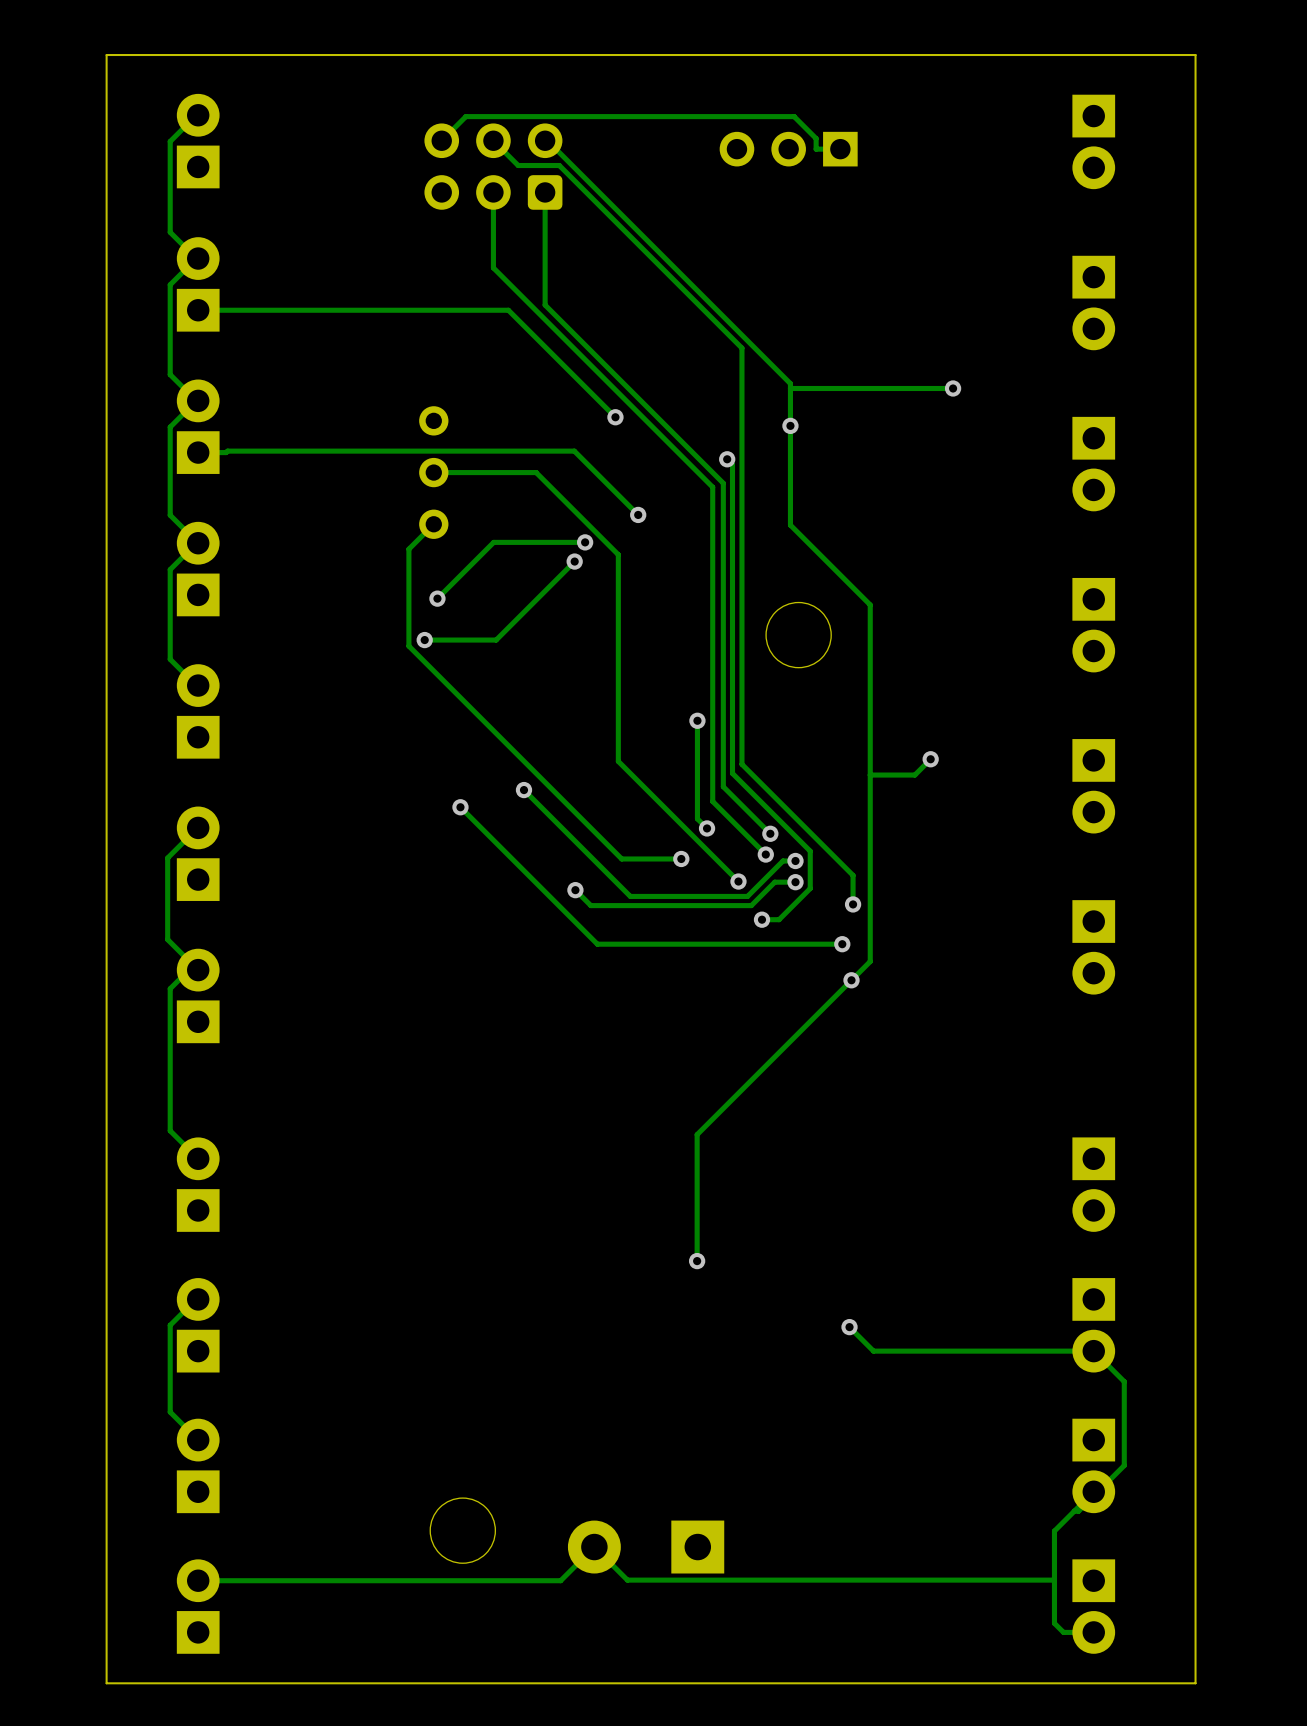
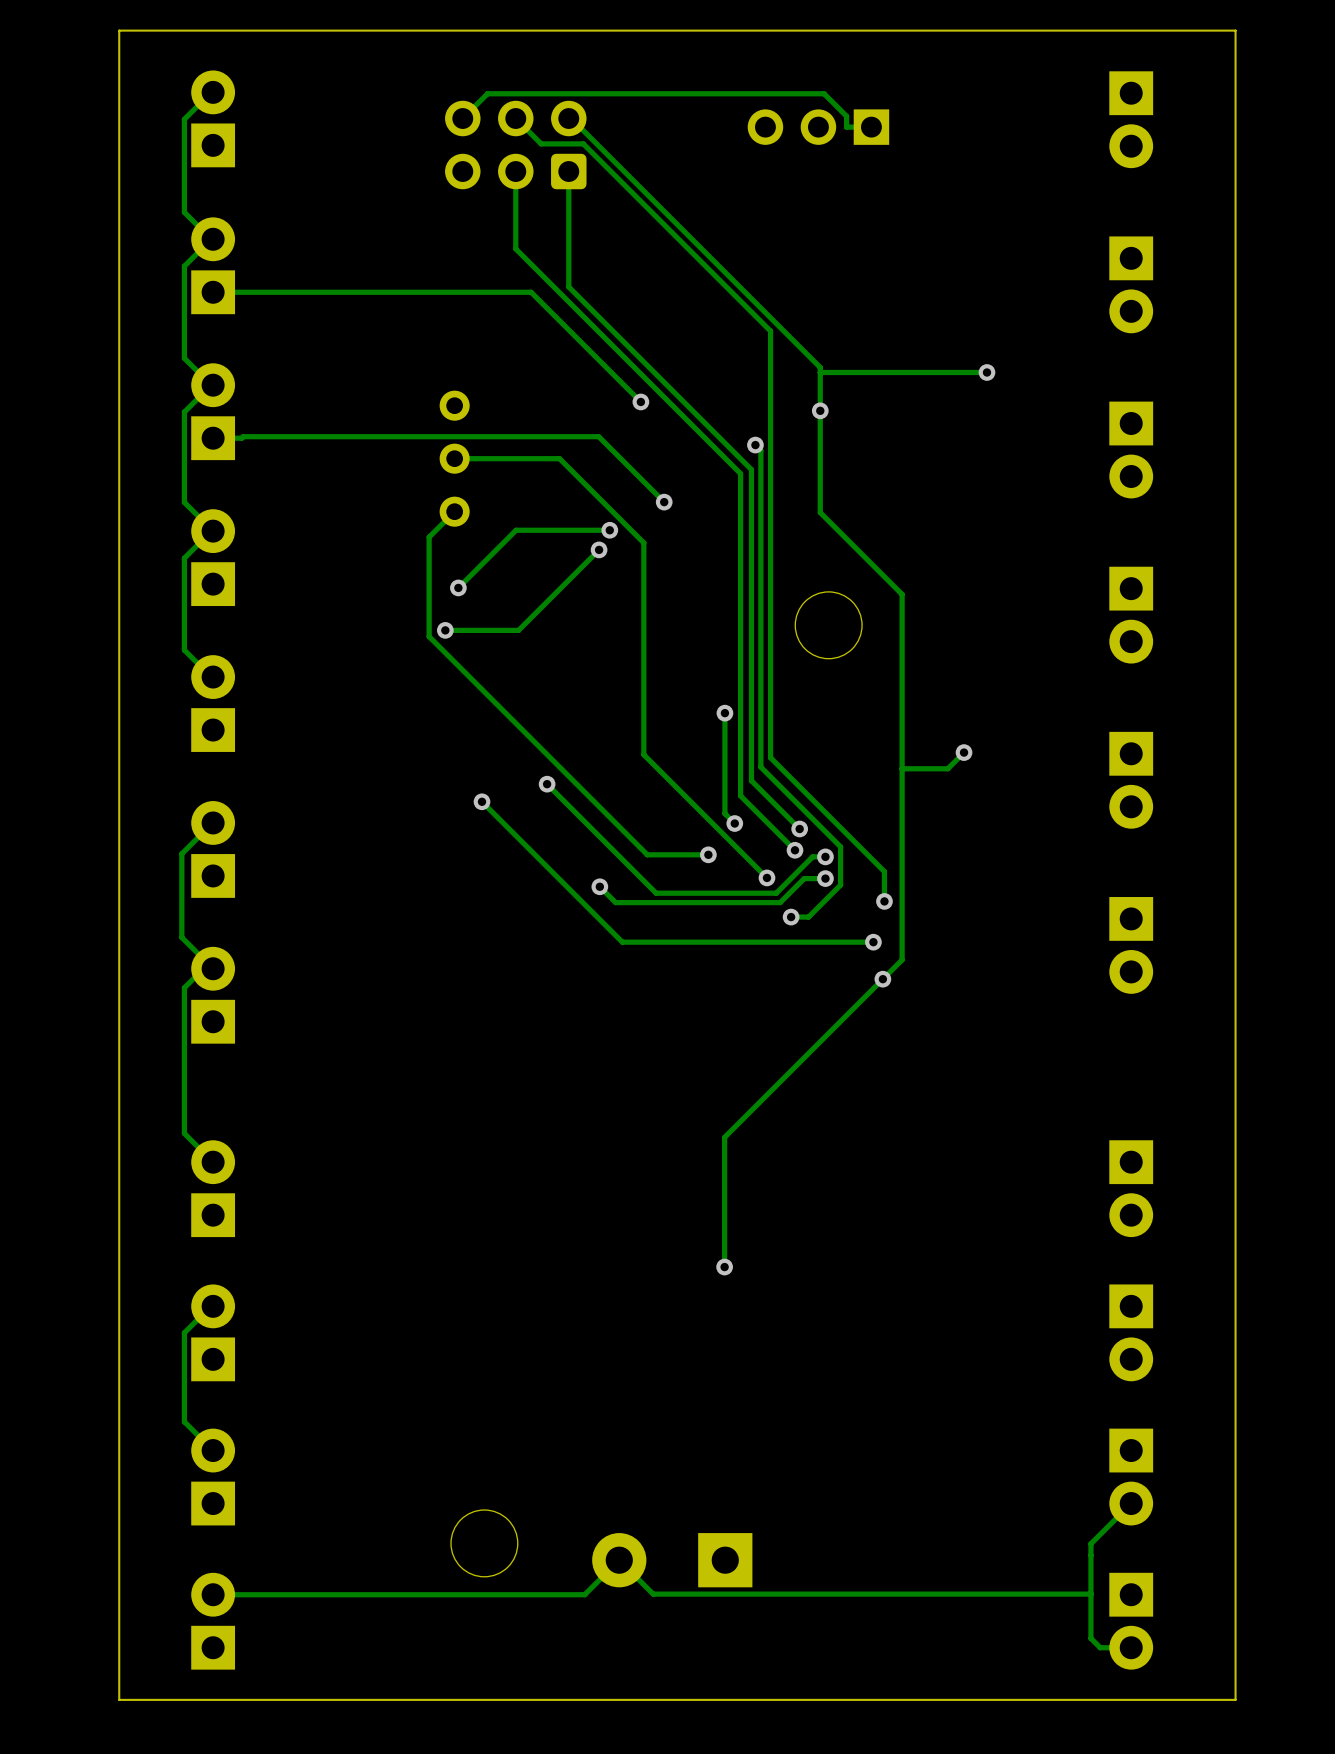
track: (849, 1327) (873, 1351) (1093, 1351) (1124, 1381) (1124, 1465) (1078, 1511) (1074, 1511) -> none
via: (849, 1327) -> none

